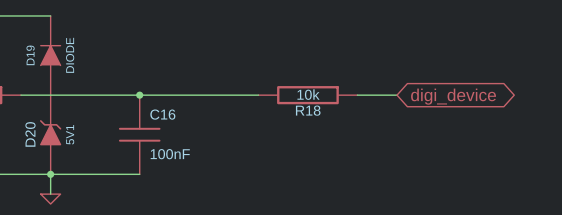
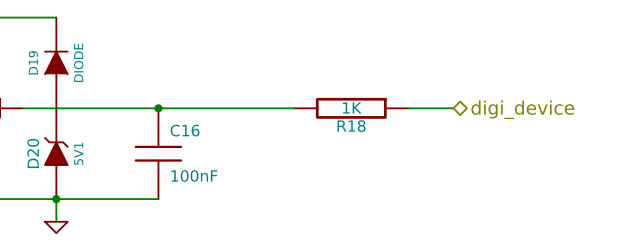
R18 value: 10k (308, 94) -> 1K (352, 107)
global label: digi_device (453, 96) -> none
hierarchical label: none -> digi_device (522, 109)

